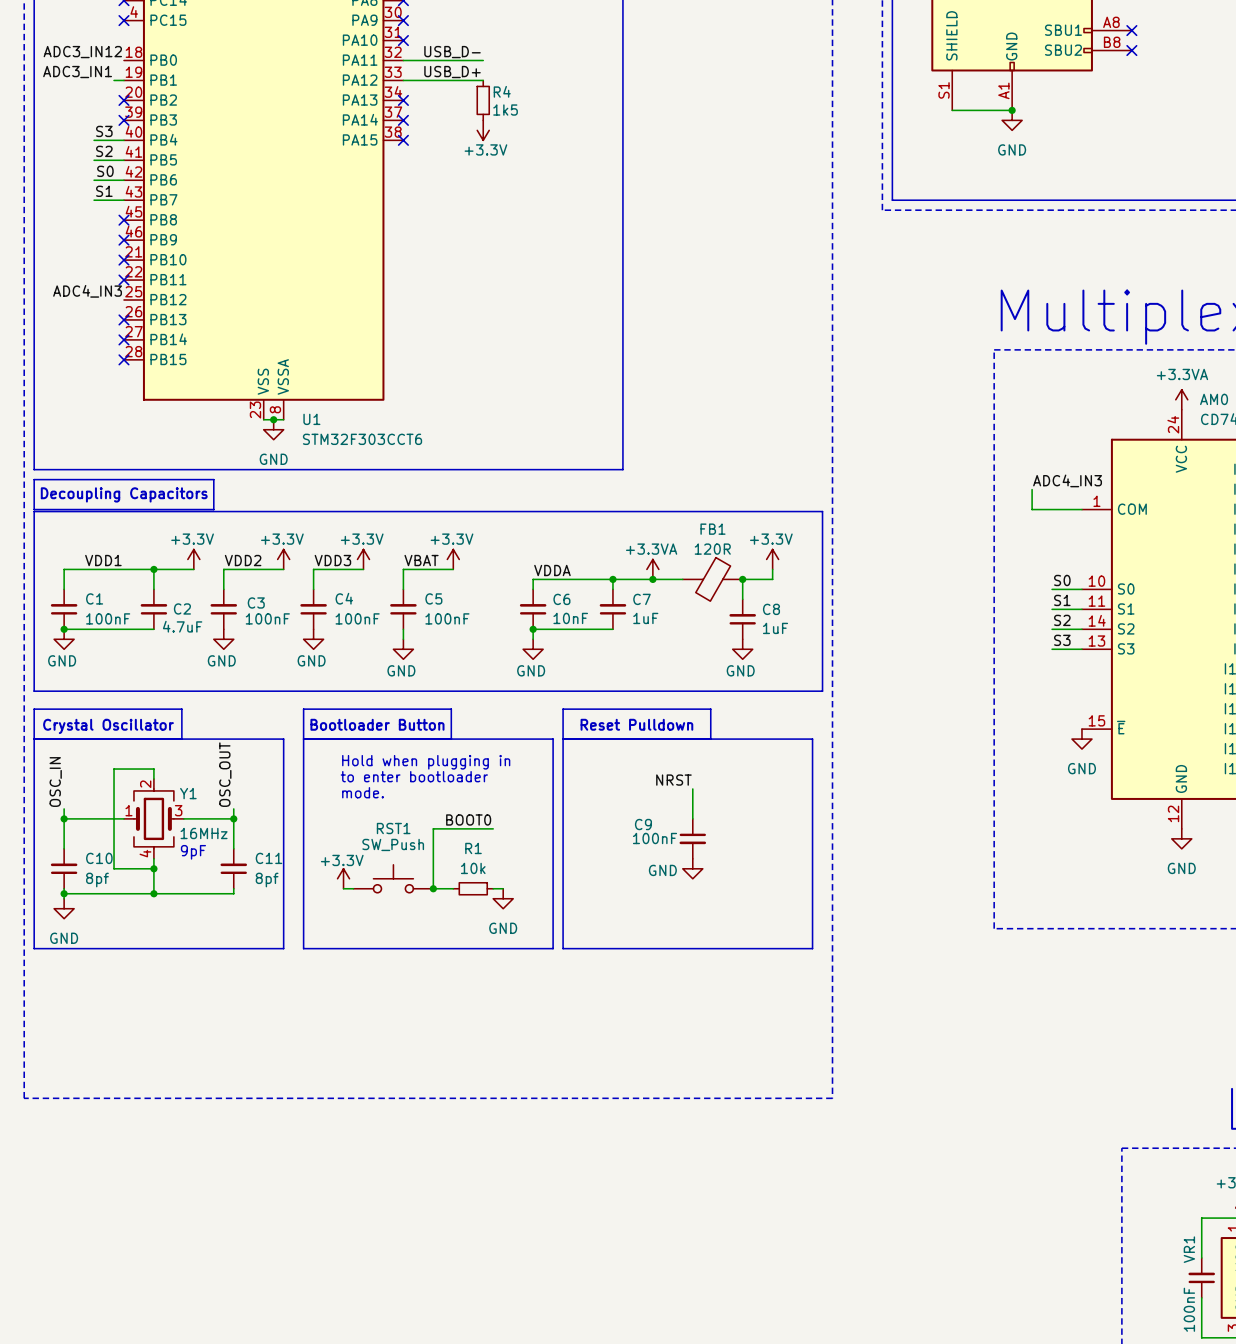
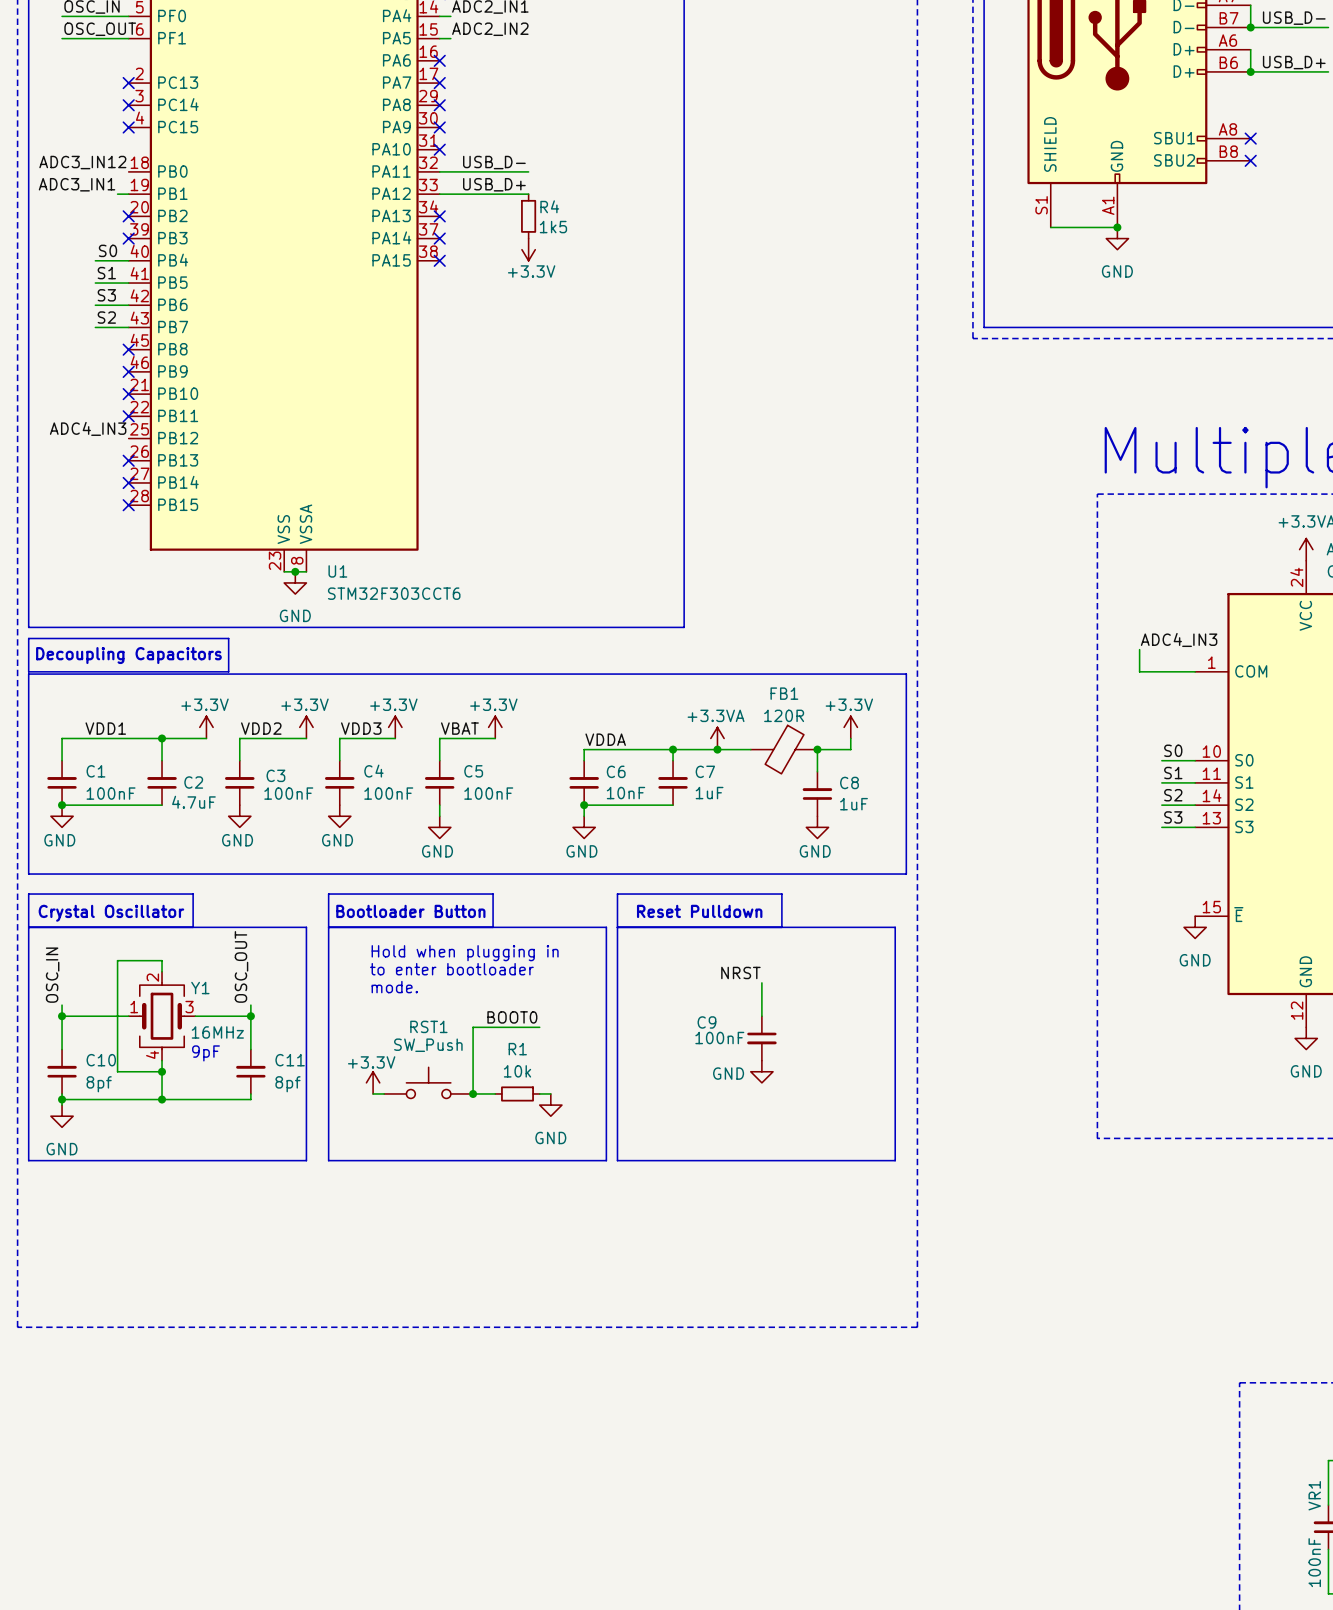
label: S3 (104, 131) -> S0 (107, 250)
label: S2 (104, 151) -> S1 (106, 273)
label: S0 (105, 171) -> S3 (106, 295)
label: S1 (104, 191) -> S2 (106, 317)

